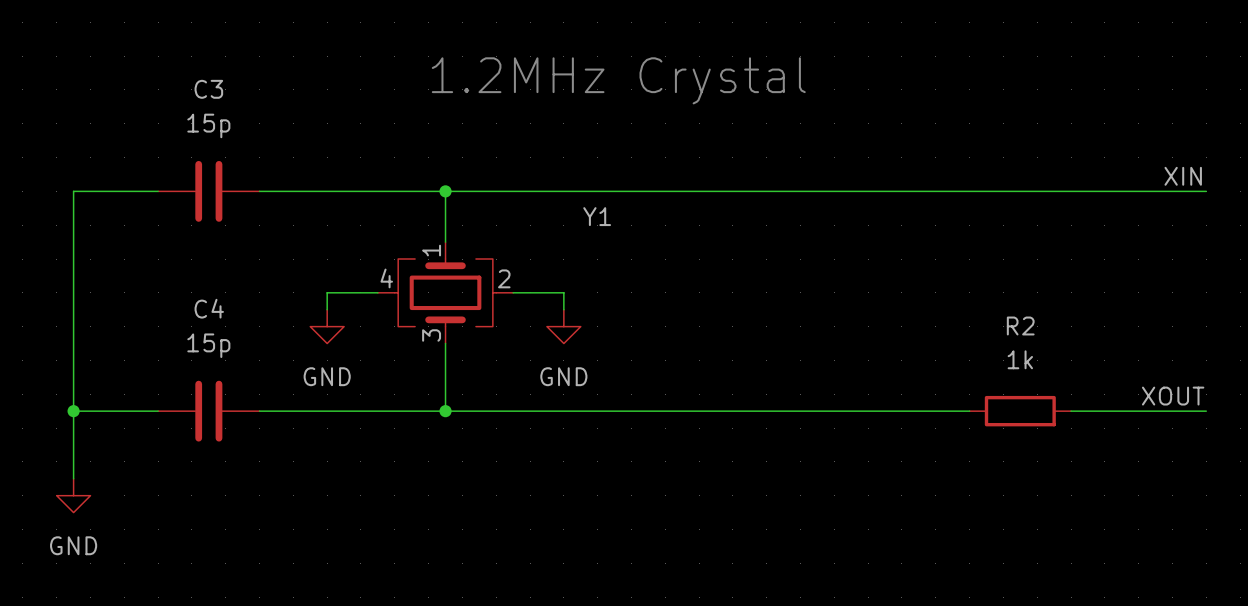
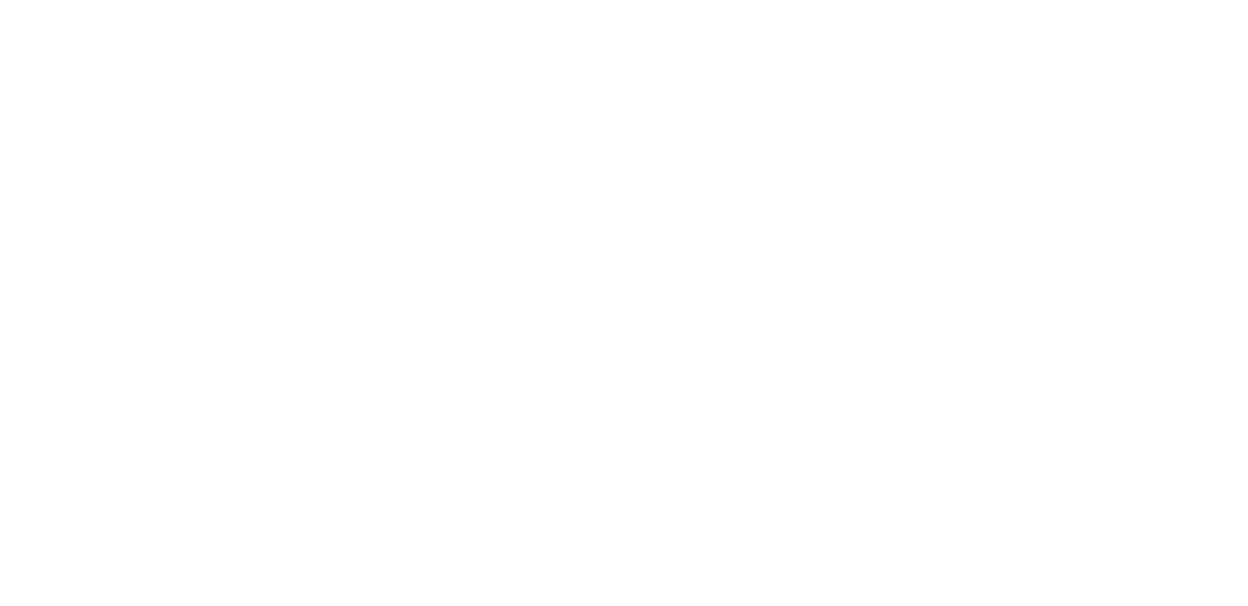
text: 1.2MHz Crystal (618, 80) -> none
label: XIN (1183, 176) -> none
wire: (158, 191) (73, 191) (73, 478) -> none
C3: 15p (208, 191) -> none
wire: (259, 191) (1206, 191) -> none
wire: (445, 191) (445, 242) -> none
junction: (445, 191) -> none
wire: (377, 292) (327, 292) (327, 309) -> none
Y1: (445, 292) -> none
wire: (513, 292) (563, 292) (563, 309) -> none
power symbol: GND (327, 326) -> none
power symbol: GND (563, 326) -> none
wire: (445, 343) (445, 411) -> none
label: XOUT (1173, 396) -> none
wire: (73, 411) (158, 411) -> none
junction: (73, 411) -> none
C4: 15p (208, 411) -> none
wire: (259, 411) (969, 411) -> none
junction: (445, 411) -> none
R2: 1k (1020, 411) -> none
wire: (1071, 411) (1206, 411) -> none
power symbol: GND (73, 495) -> none

